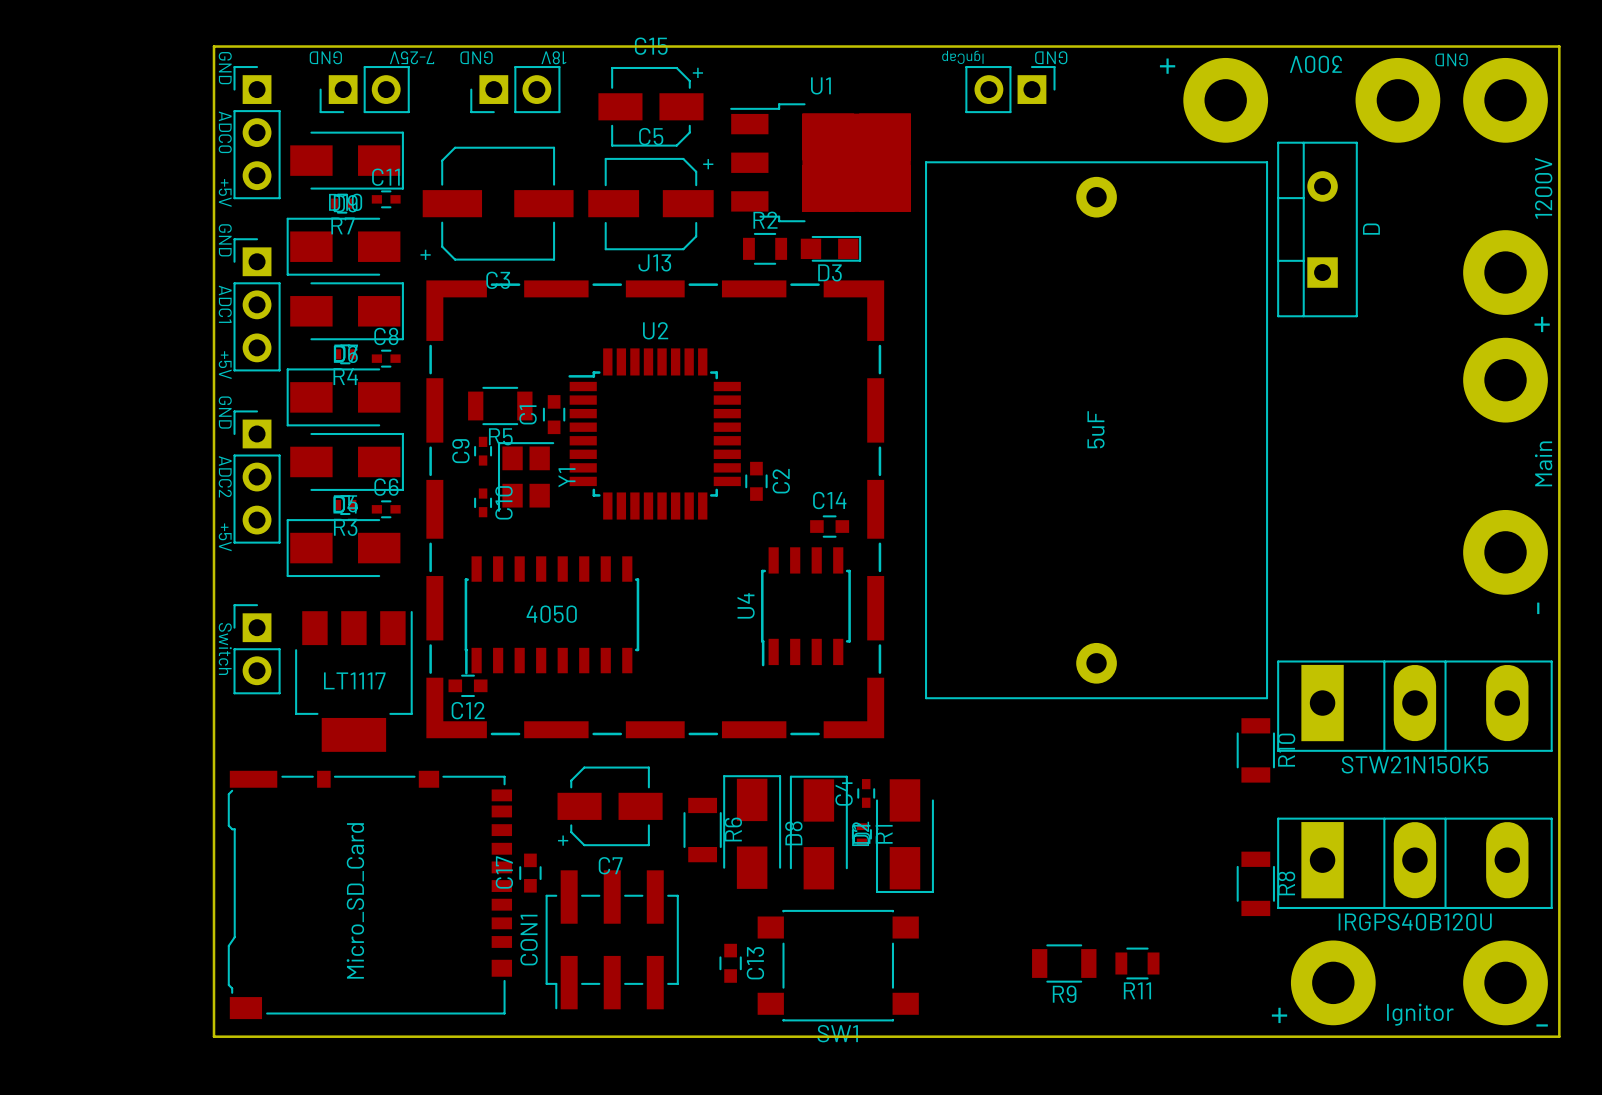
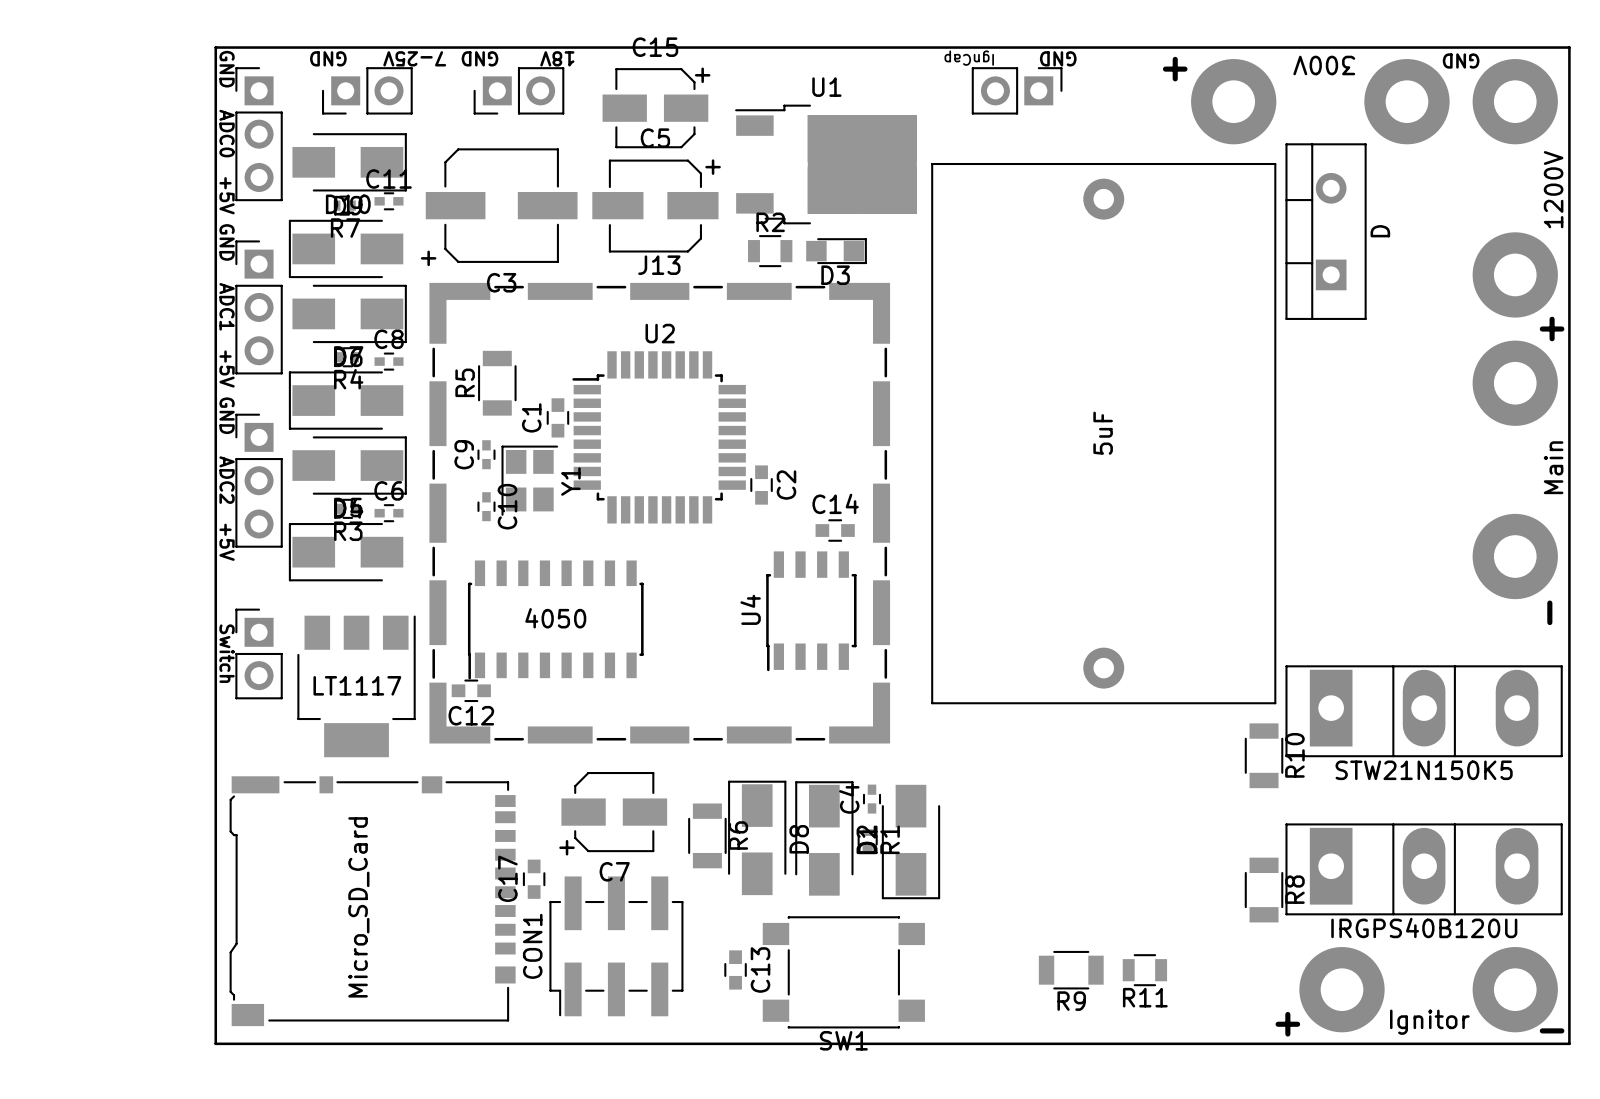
U1 footprint: [730, 103, 911, 223] -> [735, 104, 917, 225]
R5 rotation: 0° (500, 405) -> 90° clockwise (497, 383)

